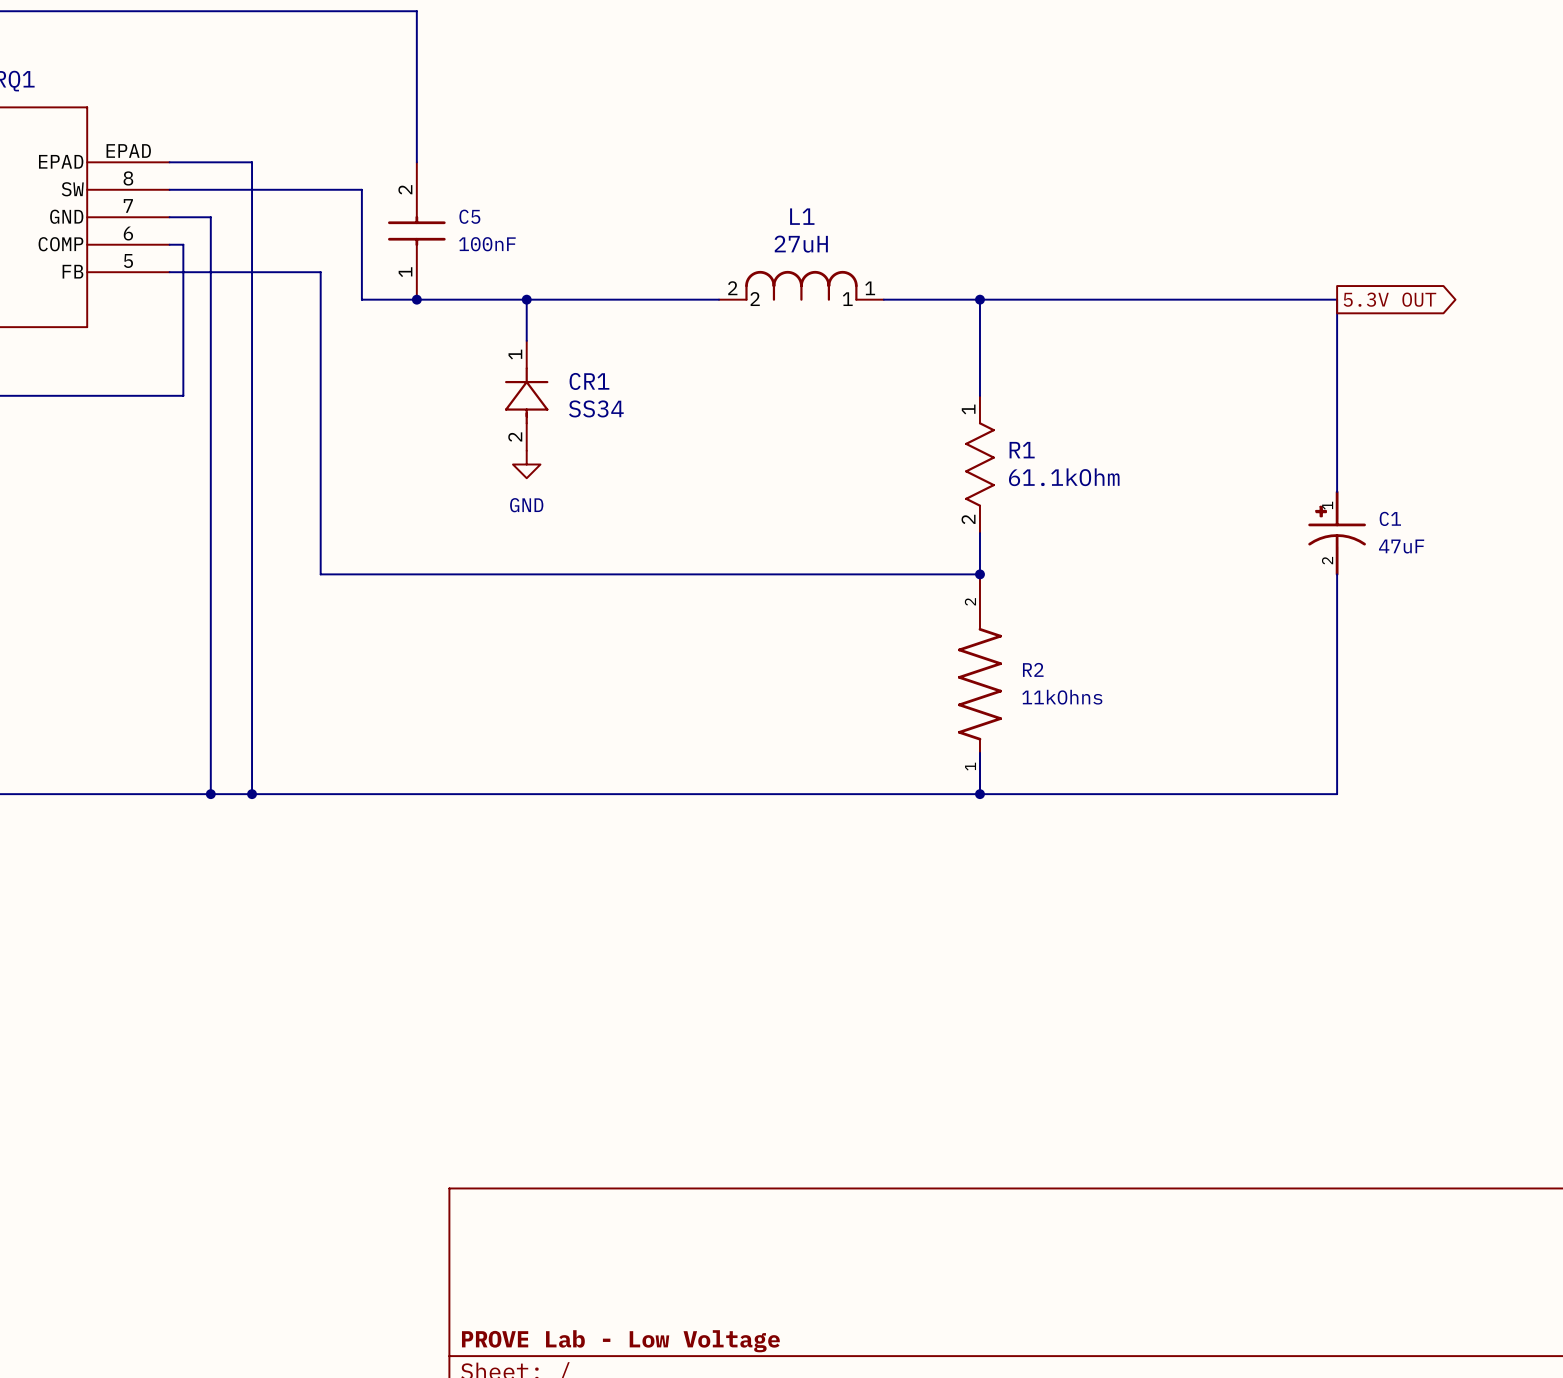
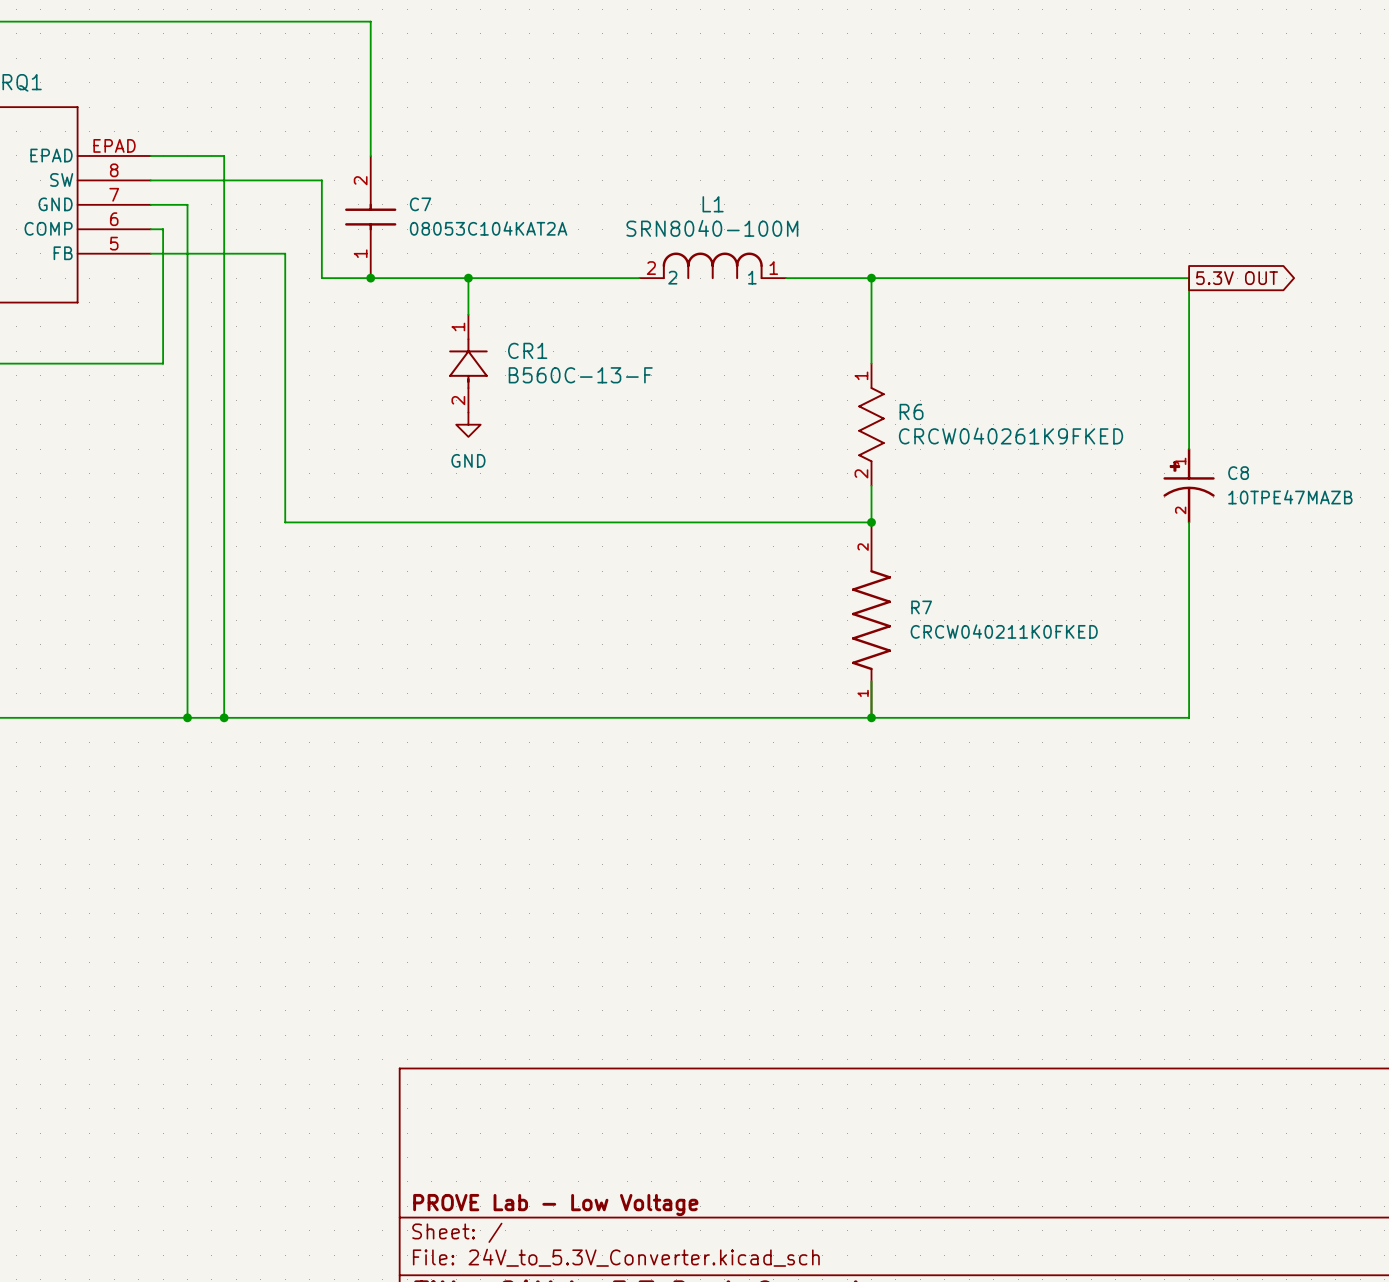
C5 name: C5 (469, 216) -> C7 (420, 204)
C5 value: 100nF (487, 244) -> 08053C104KAT2A (488, 228)
L1 value: 27uH (801, 244) -> SRN8040-100M (712, 228)
CR1 value: SS34 (596, 408) -> B560C-13-F (580, 375)
R1 name: R1 (1022, 450) -> R6 (911, 411)
R1 value: 61.1kOhm (1064, 477) -> CRCW040261K9FKED (1011, 436)
C1 name: C1 (1390, 518) -> C8 (1238, 473)
C1 value: 47uF (1401, 546) -> 10TPE47MAZB (1290, 497)
R2 name: R2 (1033, 669) -> R7 (921, 607)
R2 value: 11kOhns (1062, 697) -> CRCW040211K0FKED (1004, 631)

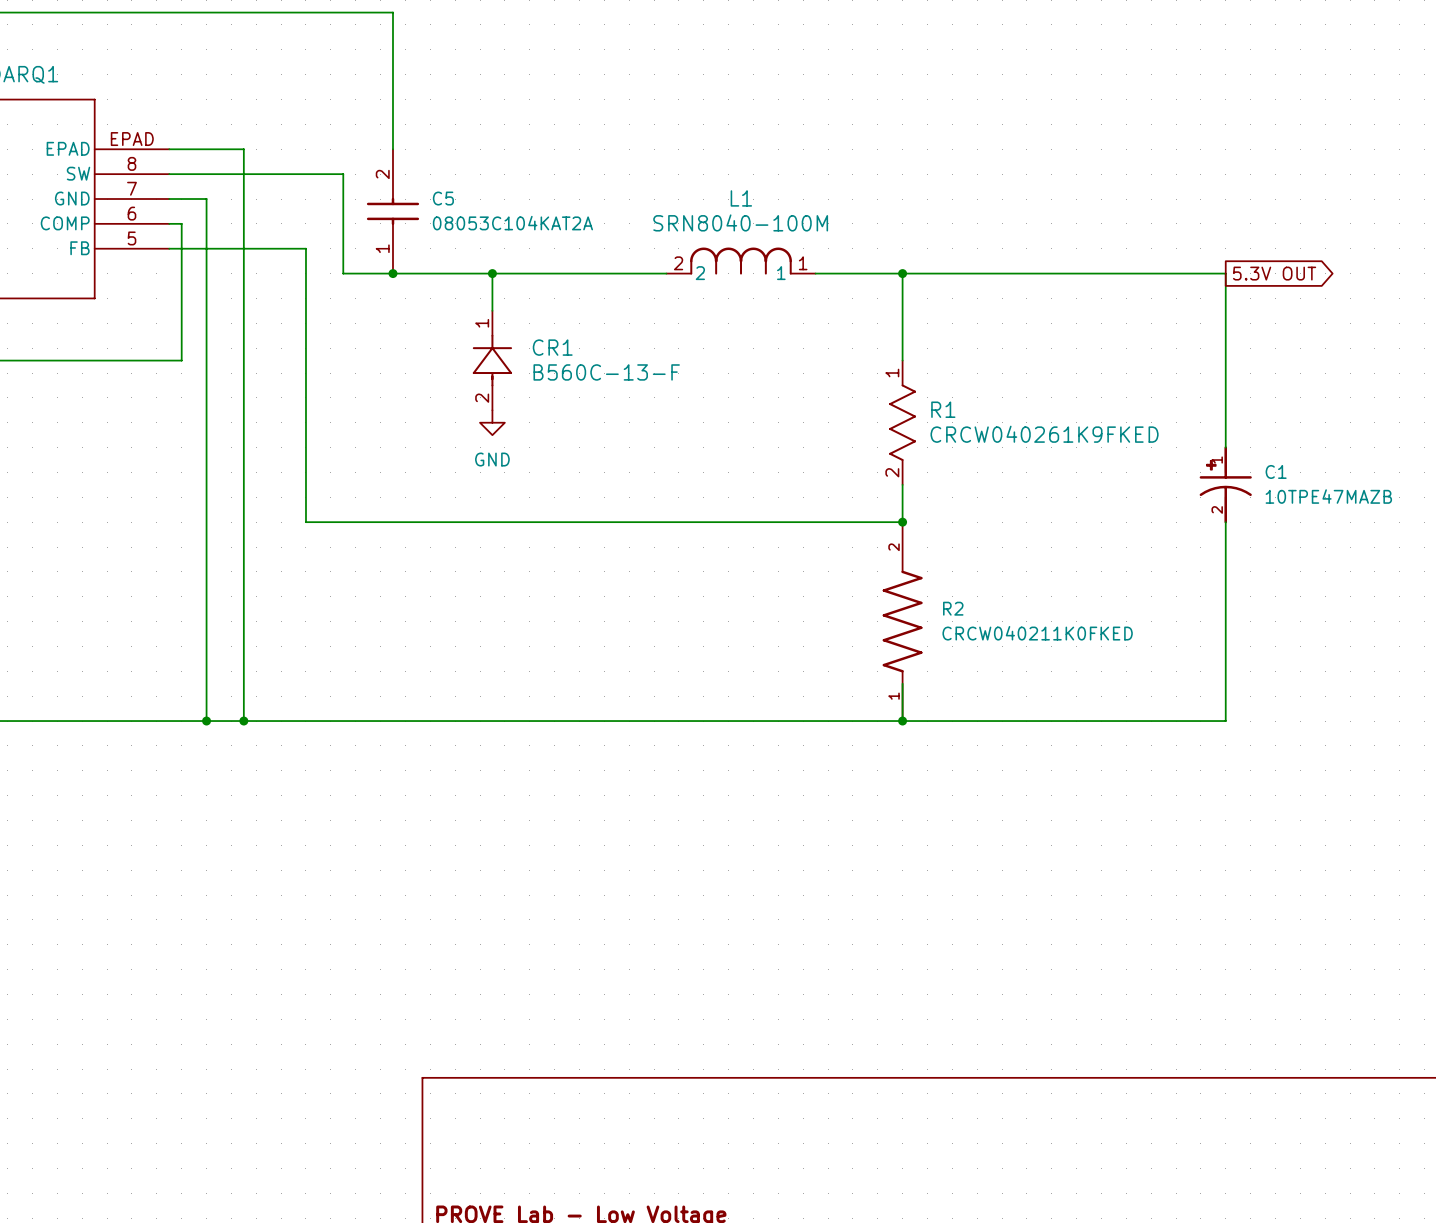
C7 name: C7 (420, 204) -> C5 (443, 198)
R6 name: R6 (911, 411) -> R1 (943, 409)
C8 name: C8 (1238, 473) -> C1 (1276, 471)
R7 name: R7 (921, 607) -> R2 (953, 608)

